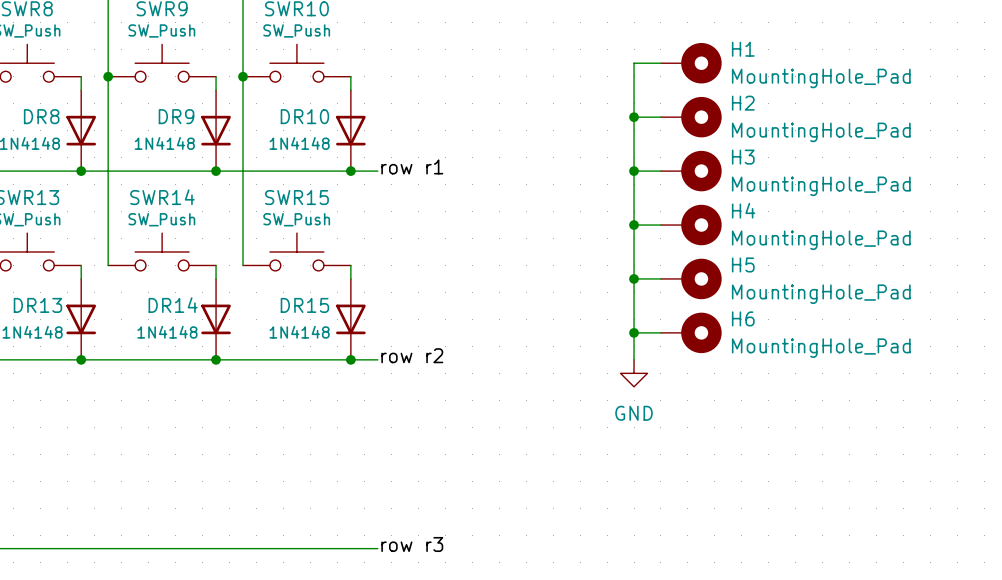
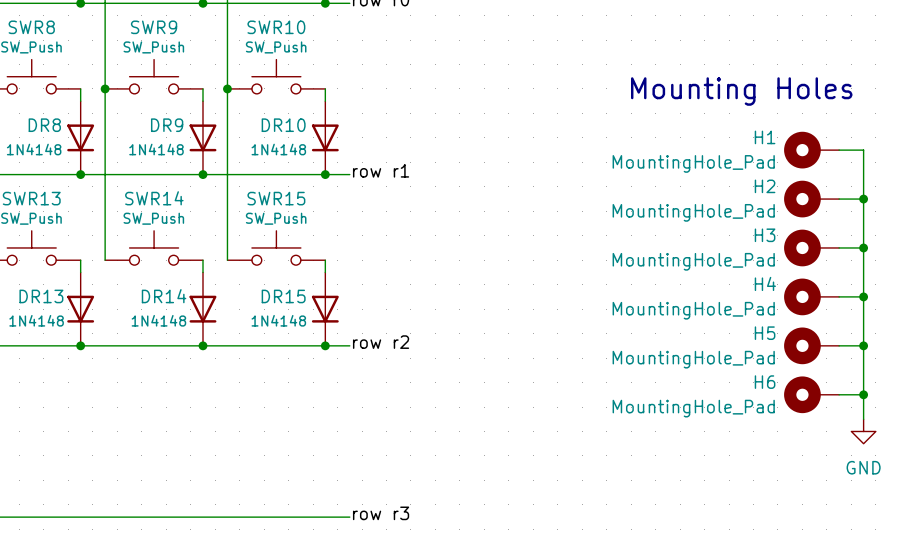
H1 name position: H1 (743, 49) -> H1 (765, 137)
wire: (660, 63) (634, 63) (634, 359) -> none
H1 position: (691, 63) -> (811, 150)
H1 rotation: 0° (701, 63) -> 180° (802, 150)
H1 value position: MountingHole_Pad (821, 78) -> MountingHole_Pad (693, 163)
text: none -> Mounting Holes (741, 91)
H2 name position: H2 (743, 103) -> H2 (765, 186)
wire: (634, 117) (660, 117) -> none
junction: (634, 117) -> none
H2 position: (691, 117) -> (811, 199)
H2 rotation: 0° (701, 117) -> 180° (802, 199)
H2 value position: MountingHole_Pad (821, 132) -> MountingHole_Pad (693, 212)
wire: none -> (839, 150) (863, 150) (863, 419)
H3 name position: H3 (743, 157) -> H3 (765, 235)
wire: (634, 171) (660, 171) -> none
junction: (634, 171) -> none
H3 position: (691, 171) -> (811, 247)
H3 rotation: 0° (701, 171) -> 180° (802, 247)
H3 value position: MountingHole_Pad (821, 186) -> MountingHole_Pad (693, 261)
wire: none -> (839, 199) (863, 199)
junction: none -> (863, 199)
H4 name position: H4 (743, 210) -> H4 (765, 283)
wire: (634, 225) (660, 225) -> none
junction: (634, 225) -> none
H4 position: (691, 225) -> (811, 296)
H4 rotation: 0° (701, 225) -> 180° (802, 296)
H4 value position: MountingHole_Pad (821, 240) -> MountingHole_Pad (693, 310)
wire: none -> (839, 247) (863, 247)
junction: none -> (863, 247)
H5 name position: H5 (743, 264) -> H5 (765, 333)
wire: (634, 278) (660, 278) -> none
junction: (634, 278) -> none
H5 position: (691, 278) -> (811, 345)
H5 rotation: 0° (701, 278) -> 180° (802, 345)
H5 value position: MountingHole_Pad (821, 294) -> MountingHole_Pad (693, 359)
wire: none -> (839, 296) (863, 296)
junction: none -> (863, 296)
H6 name position: H6 (743, 318) -> H6 (765, 382)
wire: (634, 332) (660, 332) -> none
junction: (634, 332) -> none
H6 position: (691, 332) -> (811, 394)
H6 rotation: 0° (701, 332) -> 180° (802, 394)
H6 value position: MountingHole_Pad (821, 348) -> MountingHole_Pad (693, 408)
wire: none -> (839, 345) (863, 345)
junction: none -> (863, 345)
power symbol: GND (634, 373) -> none
wire: none -> (839, 394) (863, 394)
junction: none -> (863, 394)
power symbol: none -> GND (863, 431)

